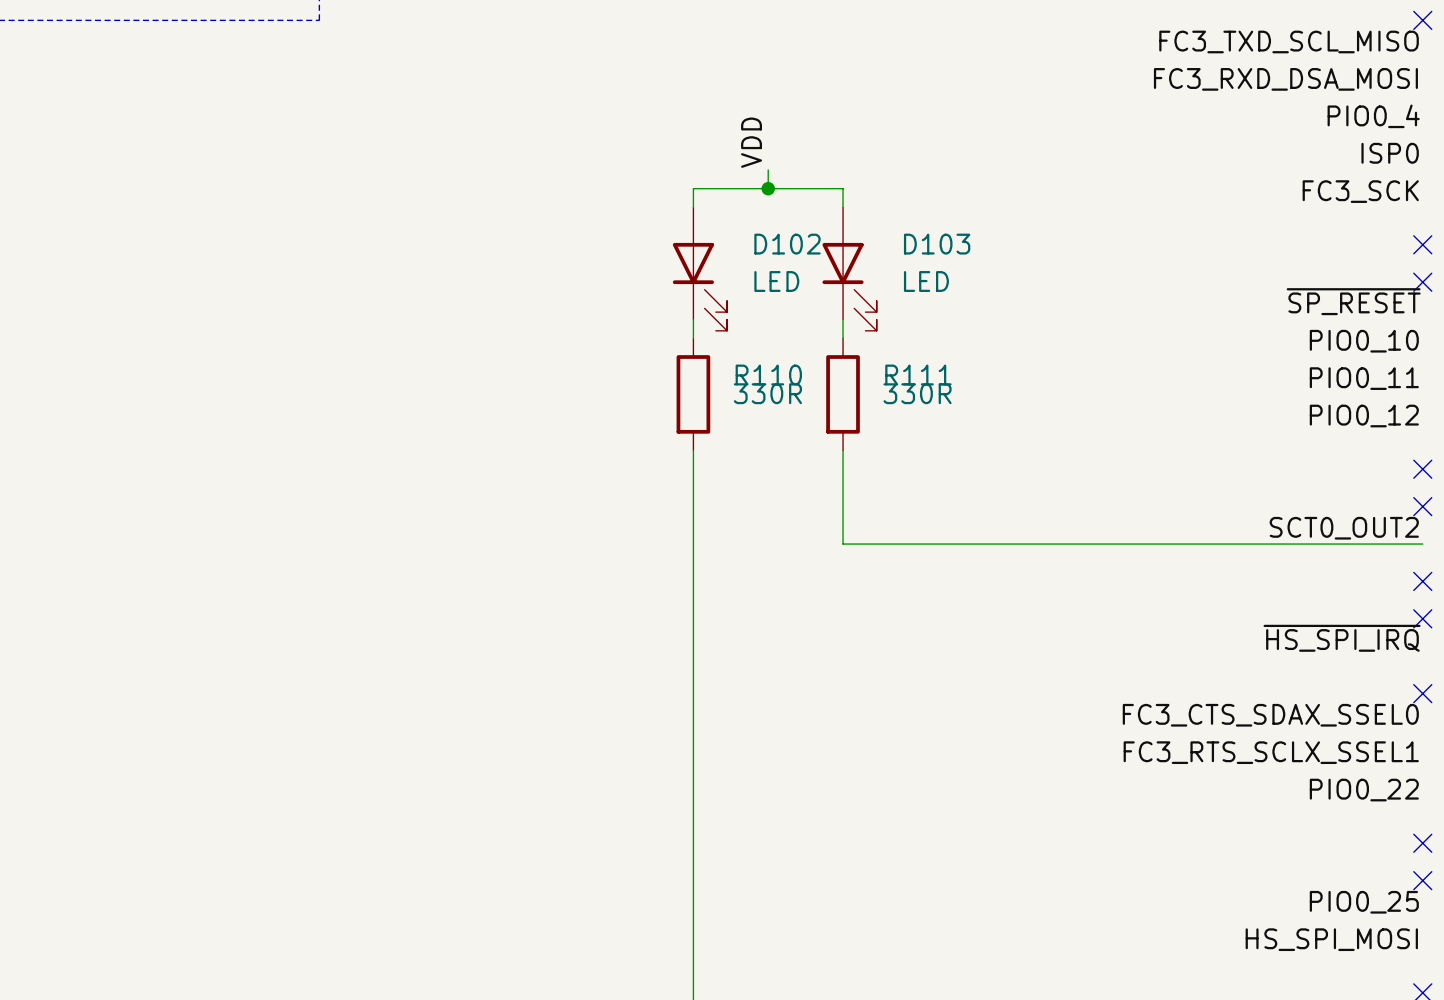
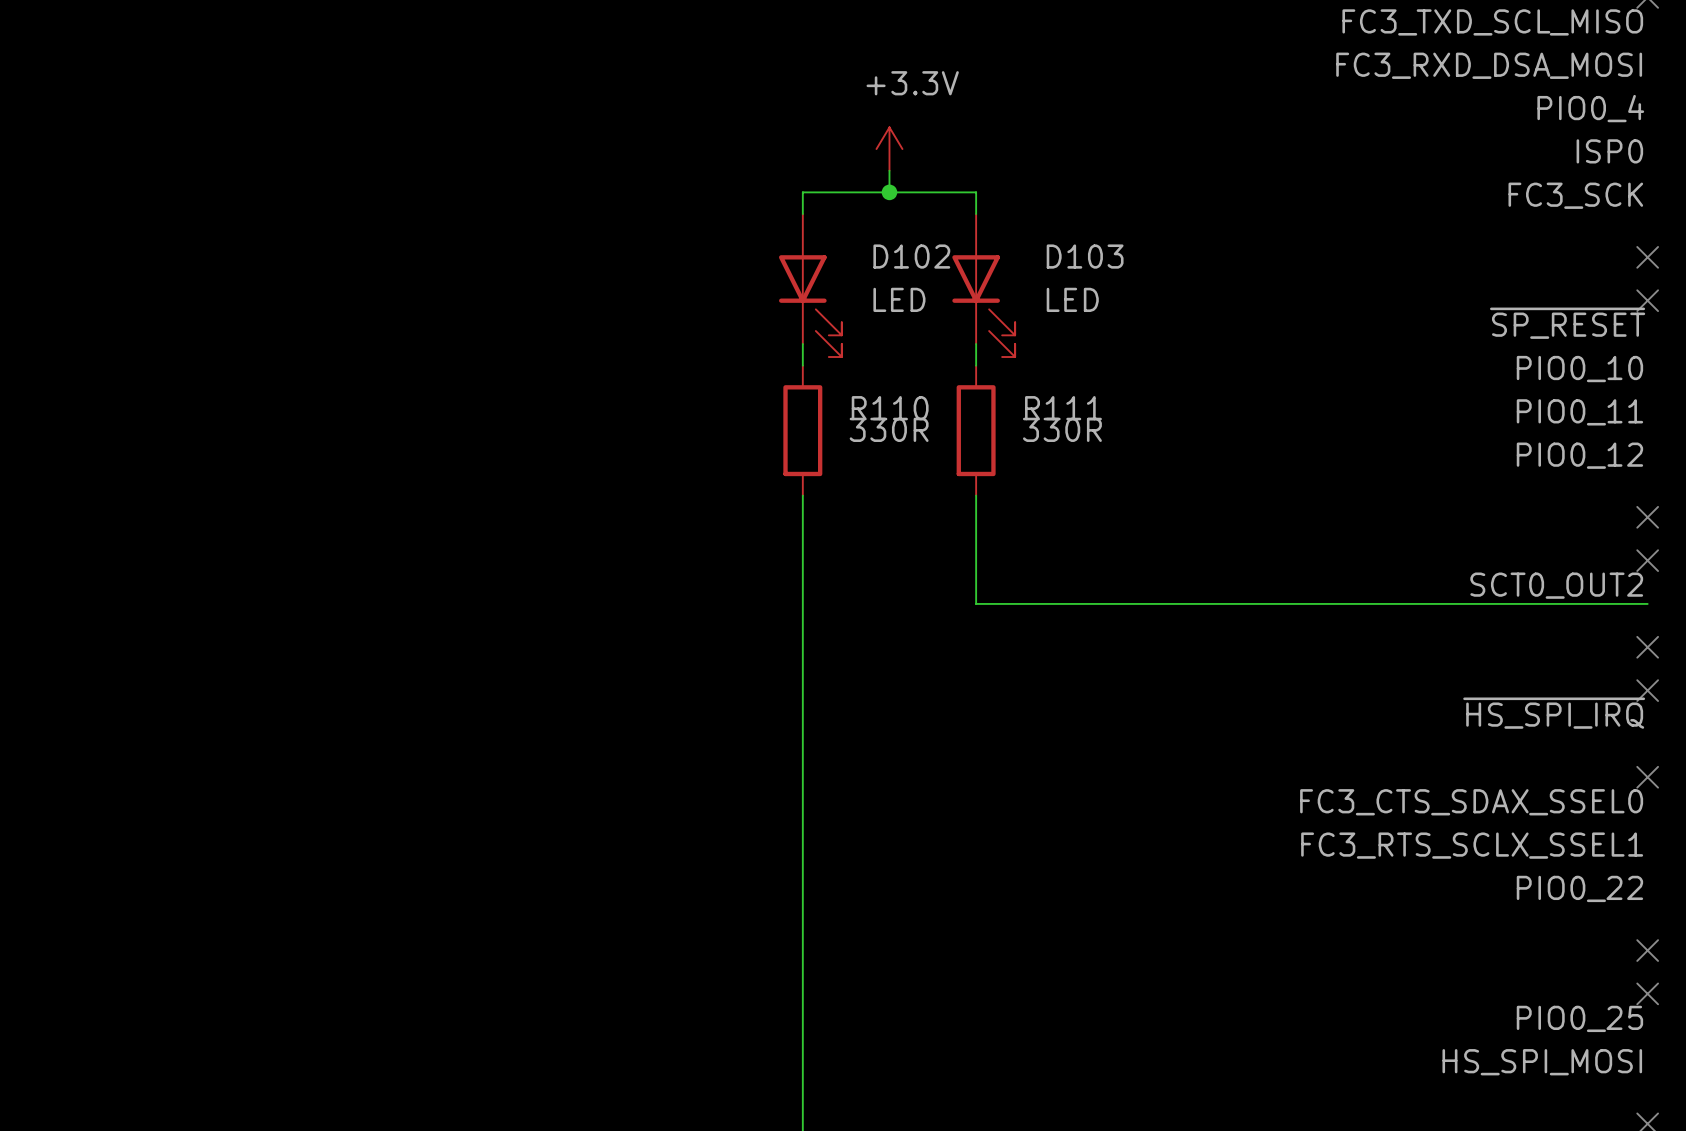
label: VDD (751, 142) -> none
power symbol: none -> +3.3V (889, 149)

